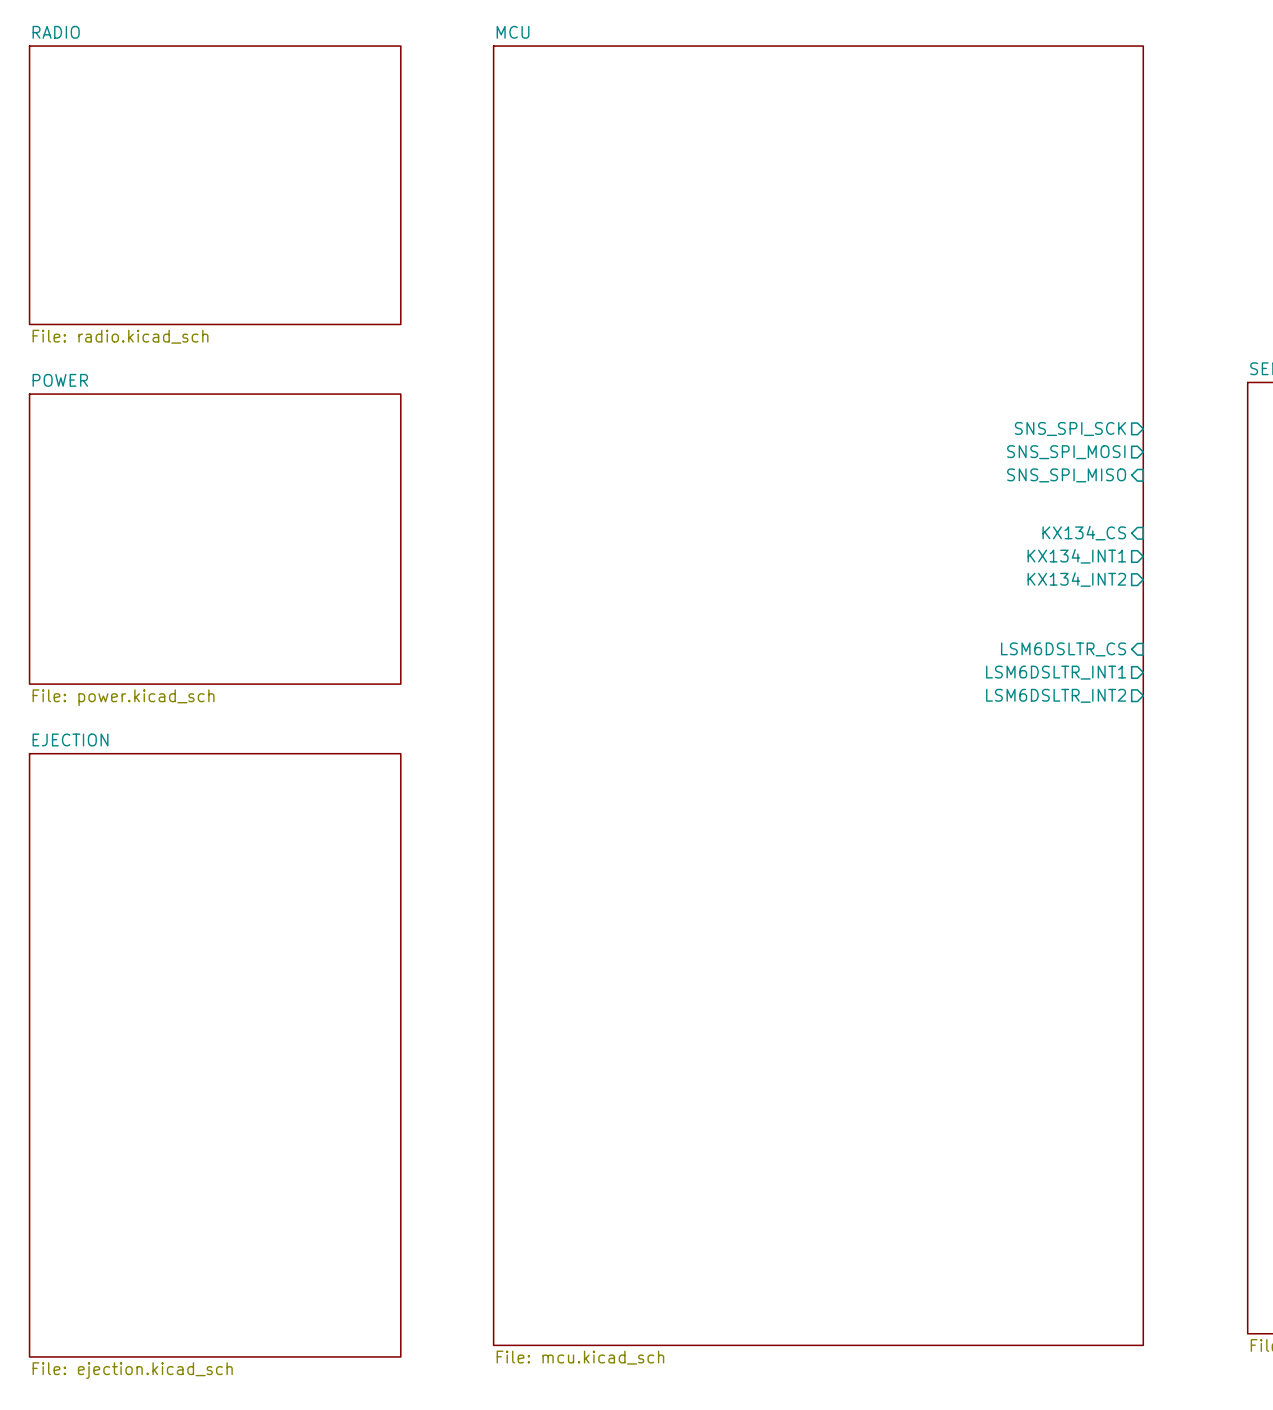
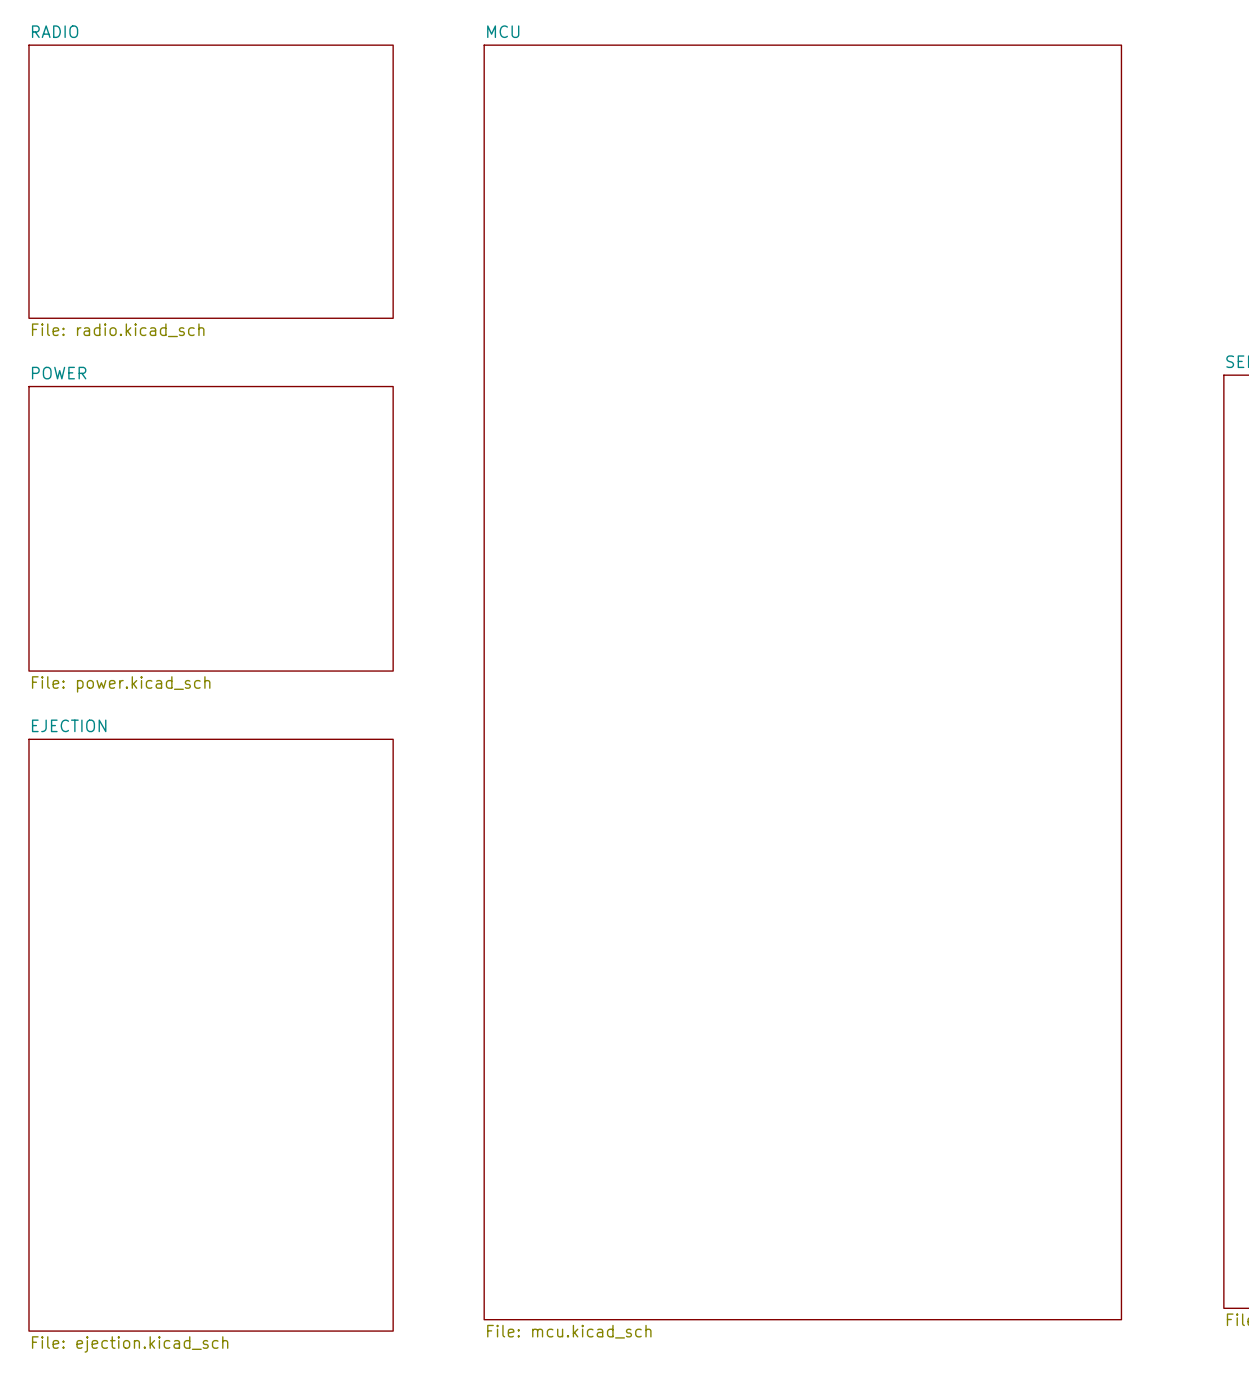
sheet pin: SNS_SPI_SCK (1070, 428) -> none
sheet pin: SNS_SPI_MOSI (1066, 452) -> none
sheet pin: SNS_SPI_MISO (1066, 475) -> none
sheet pin: KX134_CS (1084, 533) -> none
sheet pin: KX134_INT1 (1076, 556) -> none
sheet pin: KX134_INT2 (1076, 579) -> none
sheet pin: LSM6DSLTR_CS (1063, 649) -> none
sheet pin: LSM6DSLTR_INT1 (1056, 672) -> none
sheet pin: LSM6DSLTR_INT2 (1056, 695) -> none

